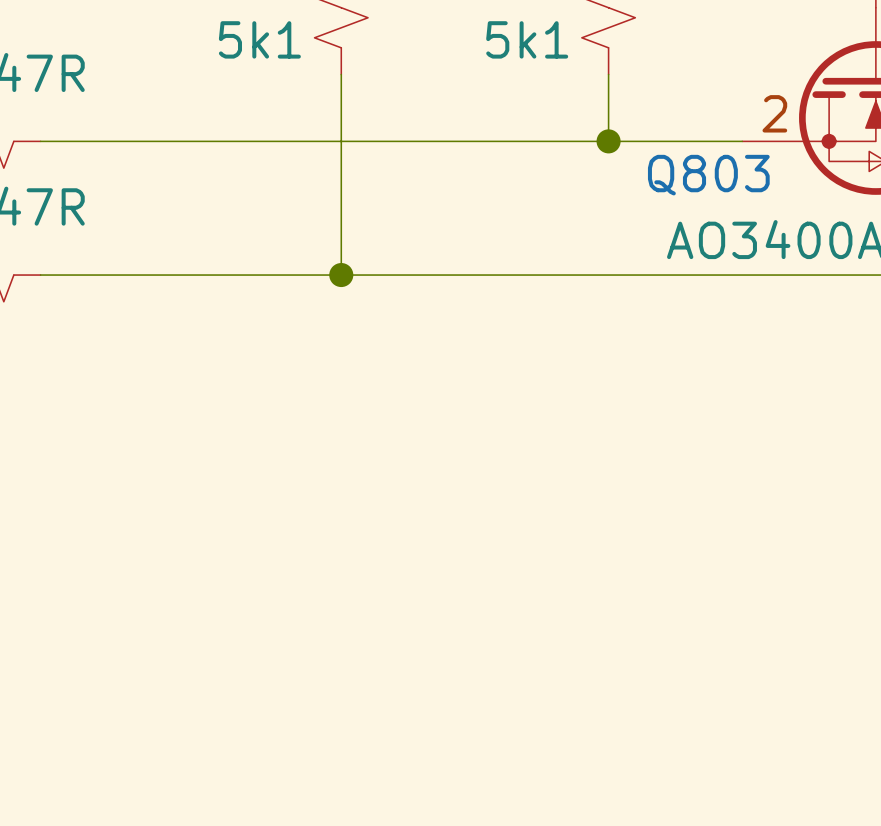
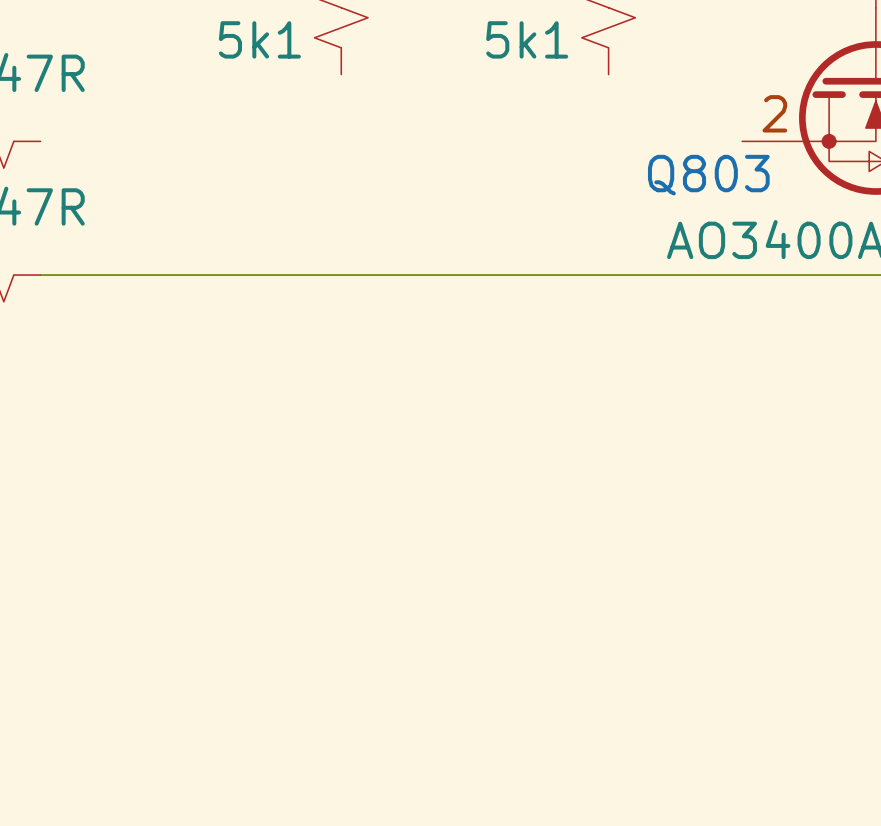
wire: (341, 74) (341, 275) -> none
wire: (608, 74) (608, 141) -> none
wire: (40, 141) (742, 141) -> none
junction: (608, 141) -> none
junction: (341, 275) -> none

